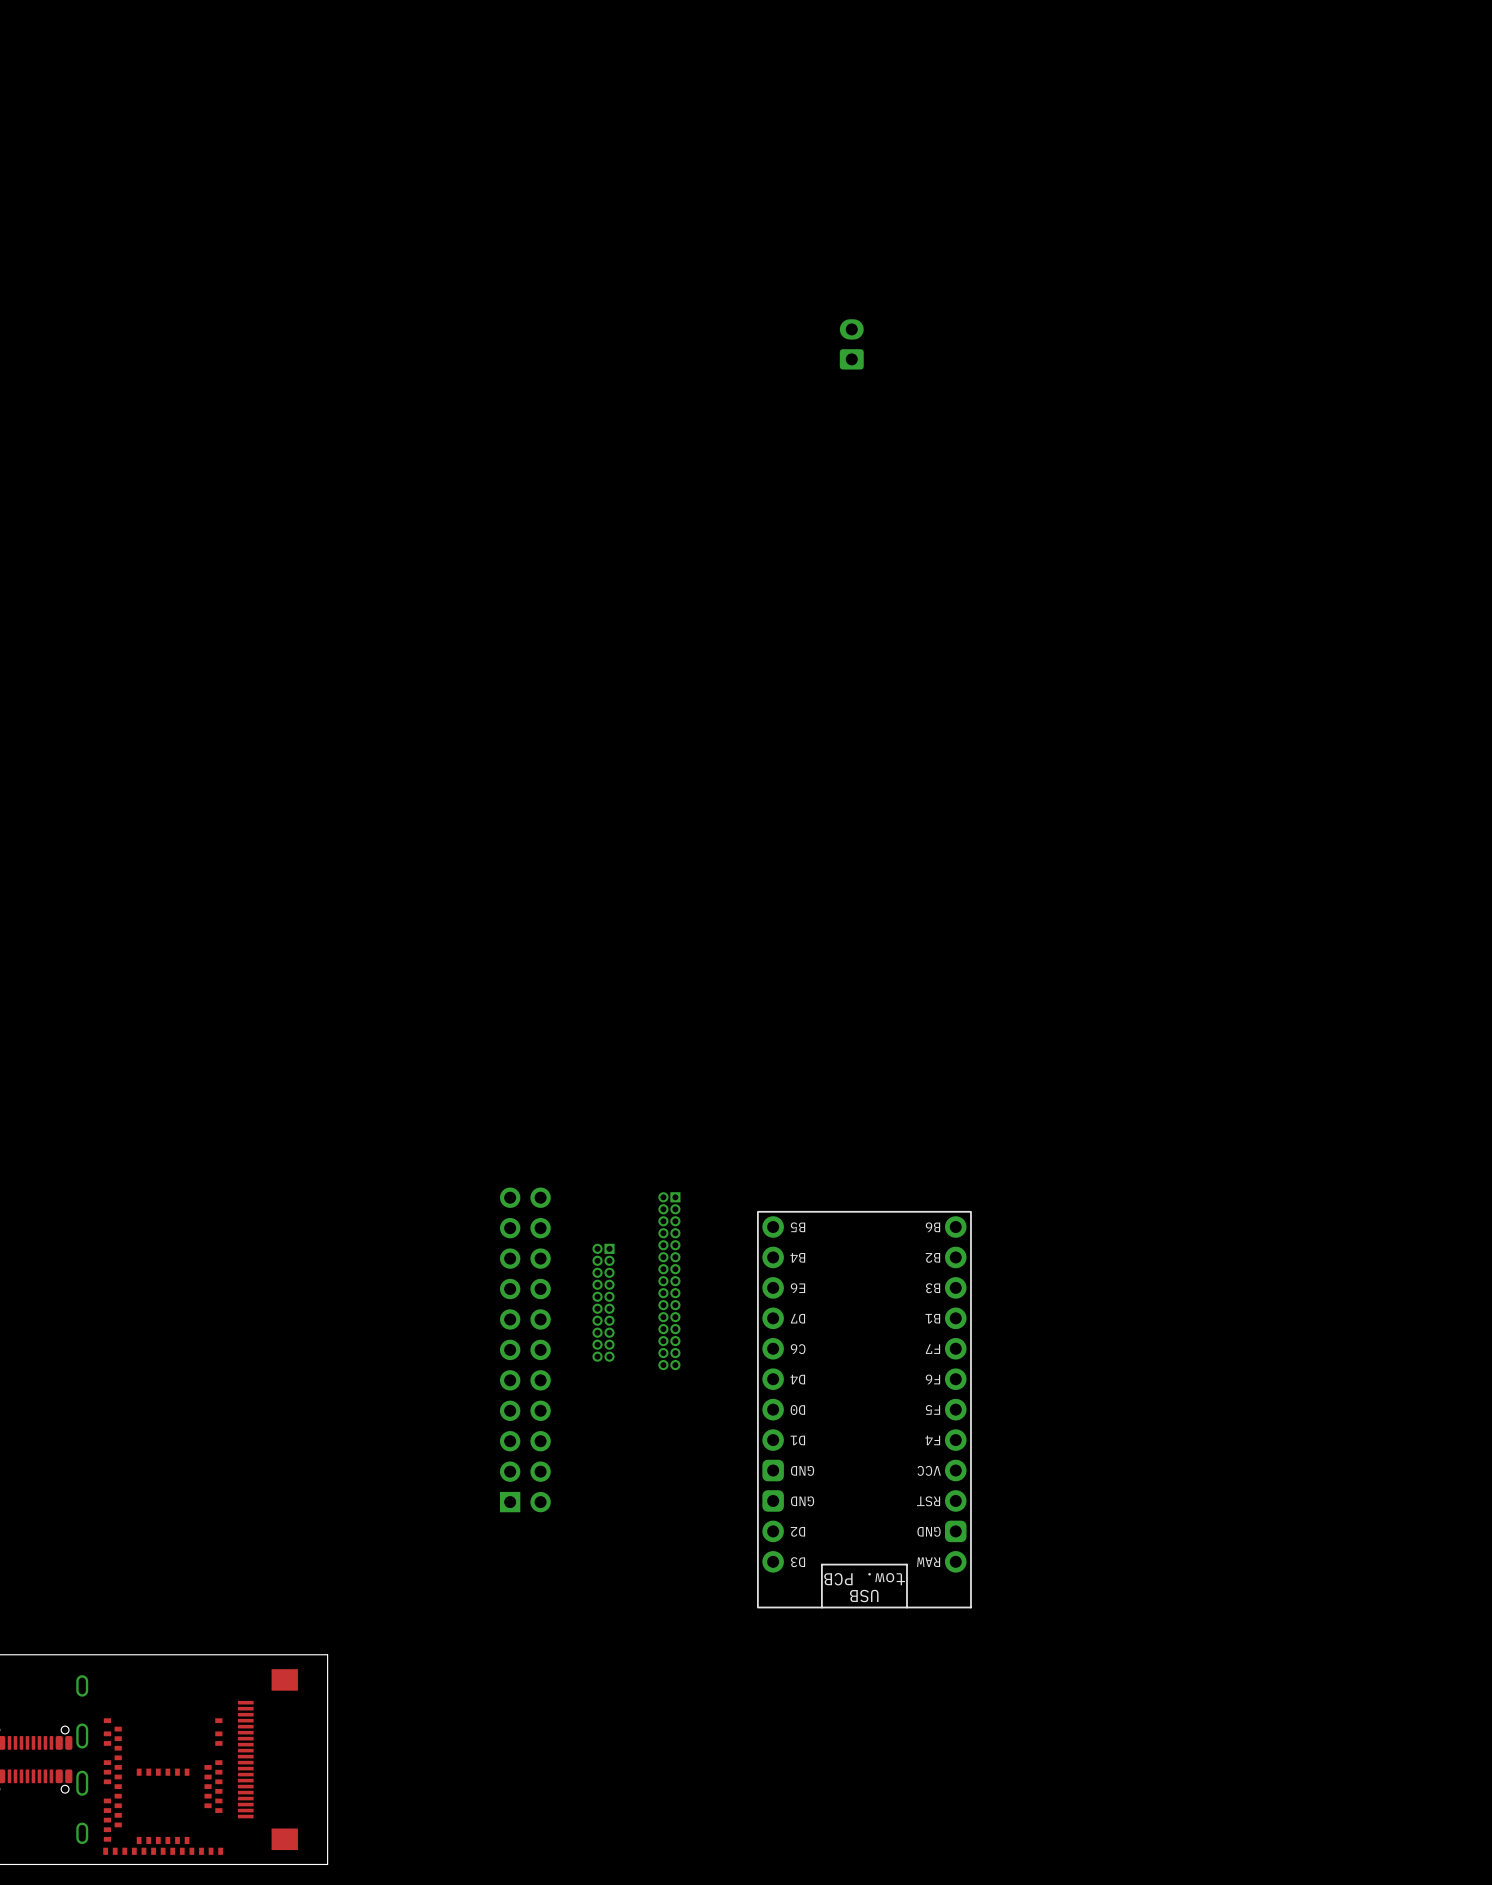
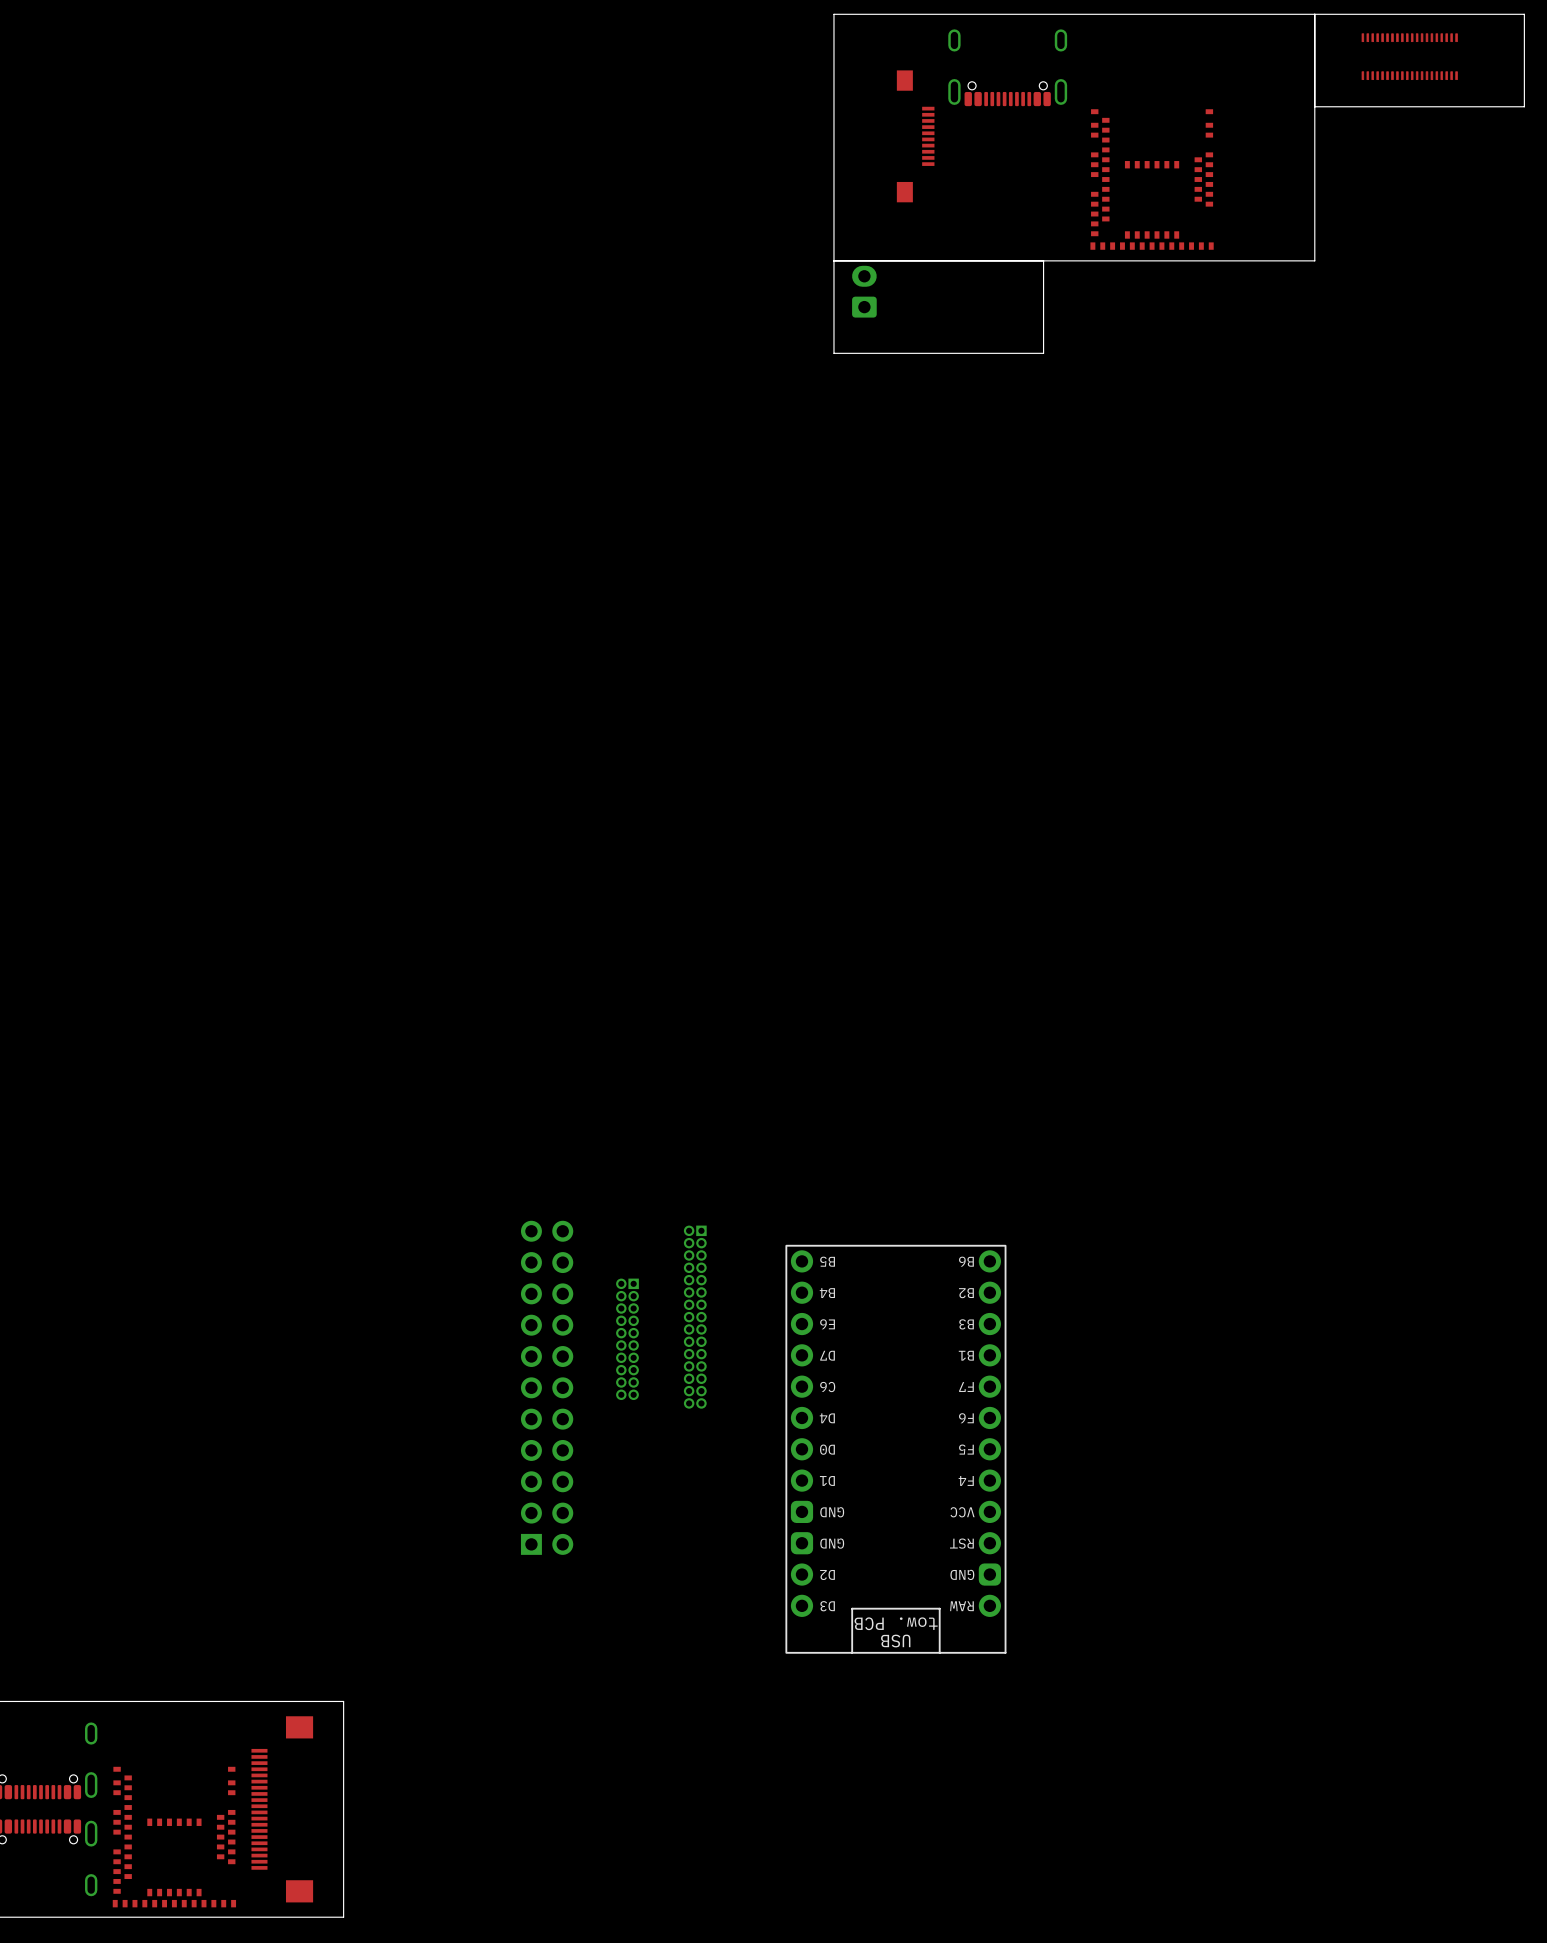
board edge: none -> (1314, 14) (1314, 260) (833, 260)
part: none -> (1409, 56)
part: none -> (1007, 67)
board edge: none -> (1314, 106) (1524, 106) (1524, 14) (833, 14) (833, 353) (1043, 353) (1043, 260)
part: none -> (915, 136)
part: none -> (1152, 179)
part position: (851, 344) -> (864, 291)

